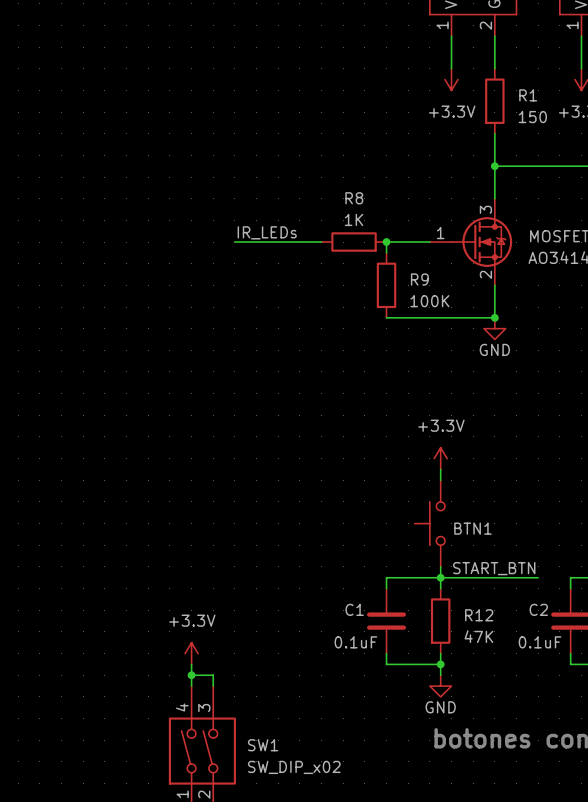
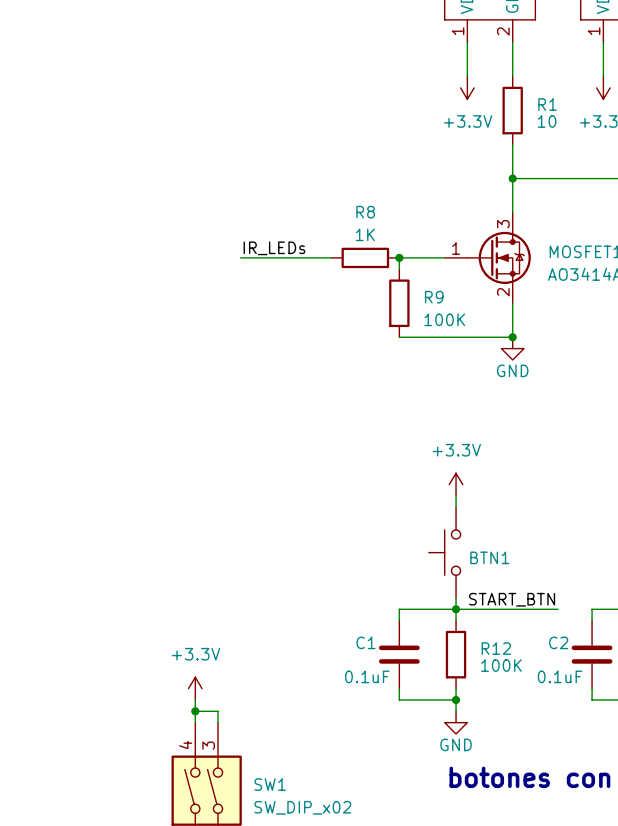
R1 value: 150 (532, 117) -> 10 (547, 121)
R12 value: 47K (478, 636) -> 100K (501, 665)

